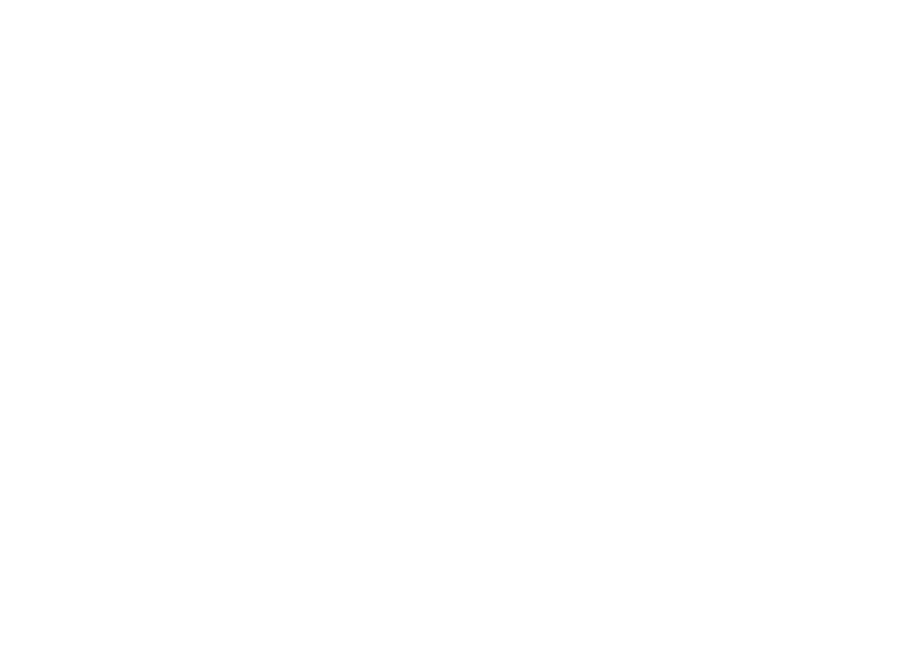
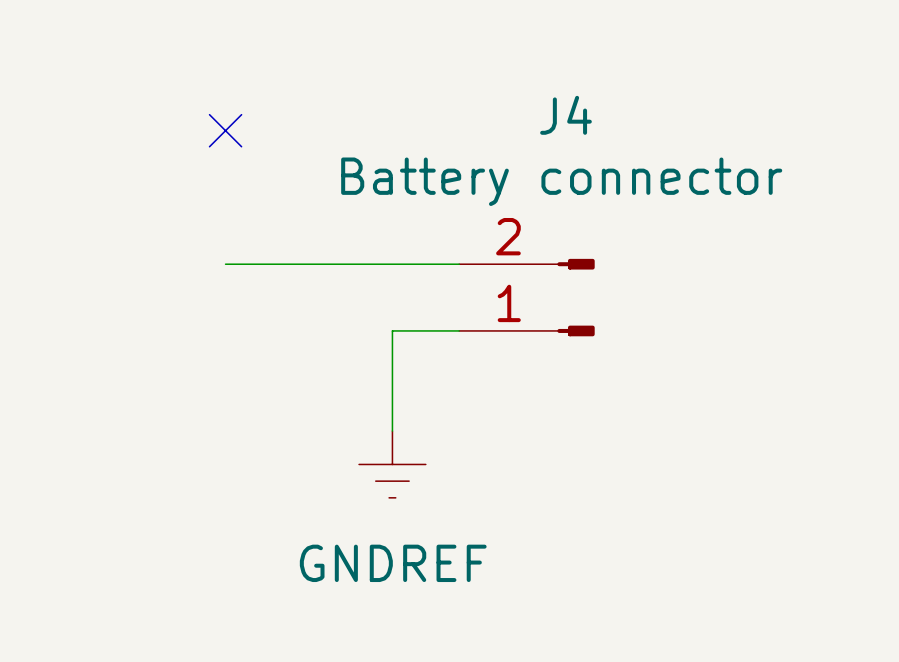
no-connect mark: none -> (225, 130)
wire: none -> (225, 264) (459, 264)
J4: none -> Battery connector (526, 297)
wire: none -> (459, 330) (392, 330) (392, 431)
power symbol: none -> GNDREF (392, 464)

